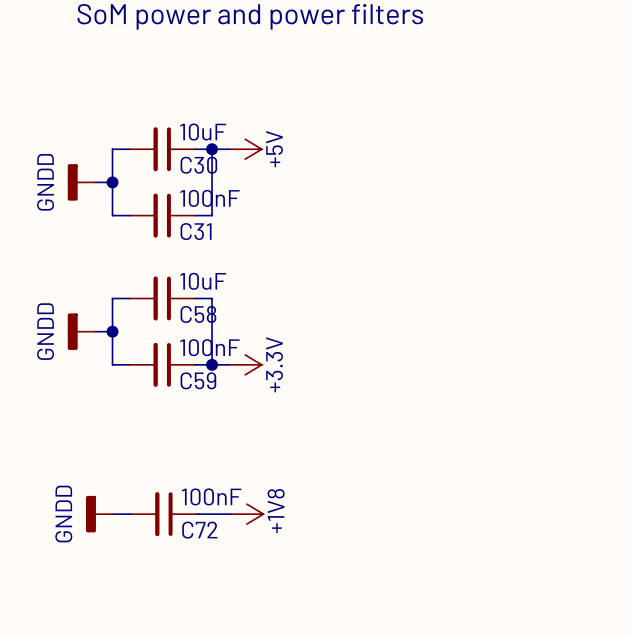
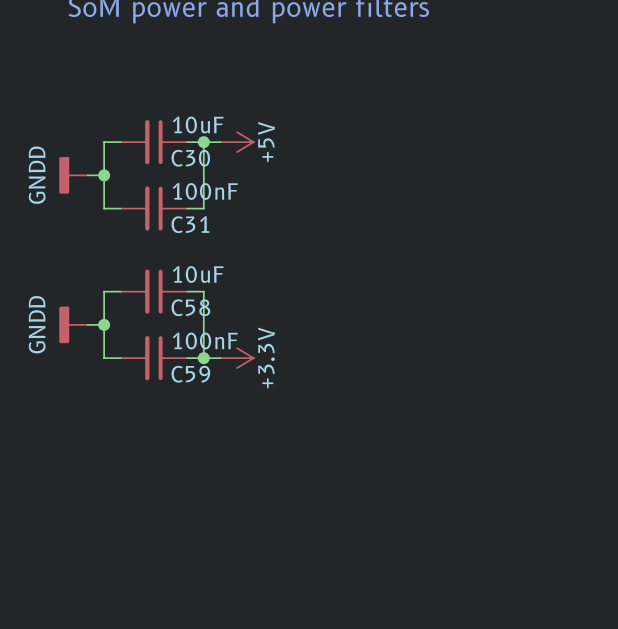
power symbol: GNDD (100, 514) -> none
wire: (114, 514) (130, 514) -> none
C72: 100nF (163, 514) -> none
wire: (197, 514) (230, 514) -> none
power symbol: +1V8 (246, 514) -> none

